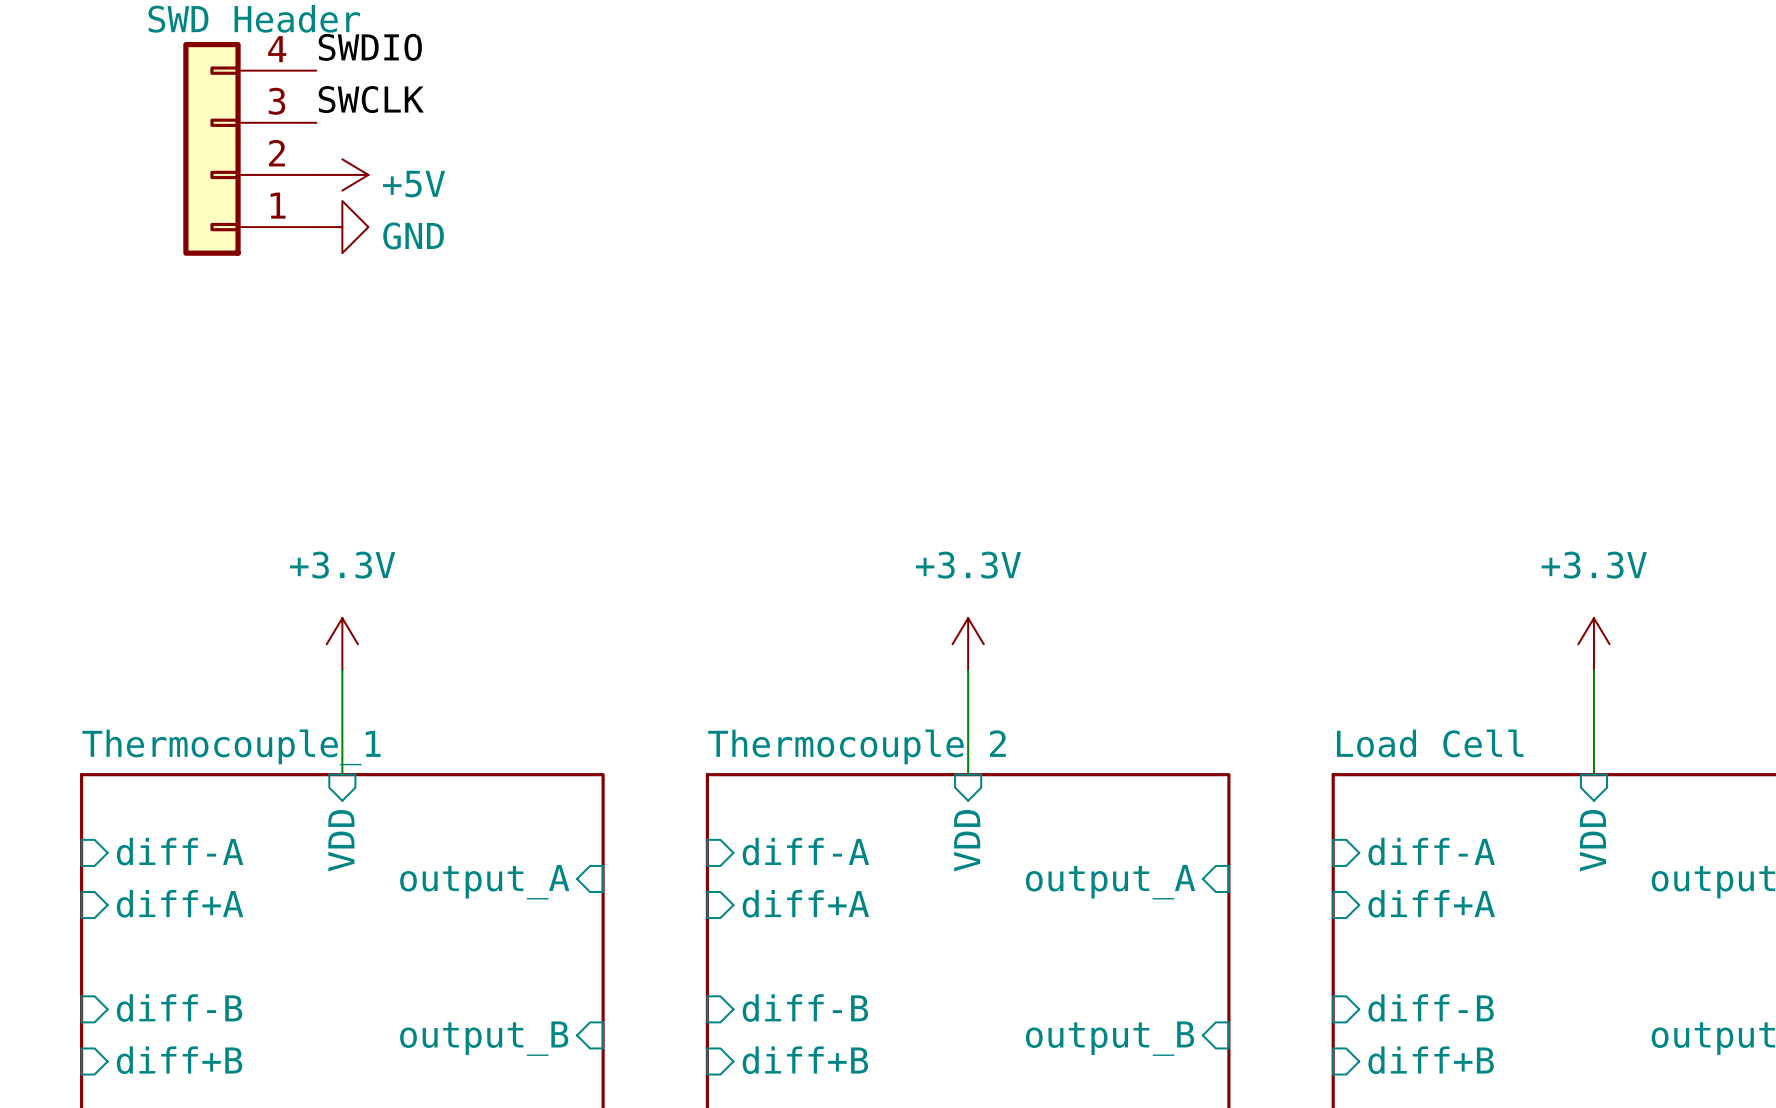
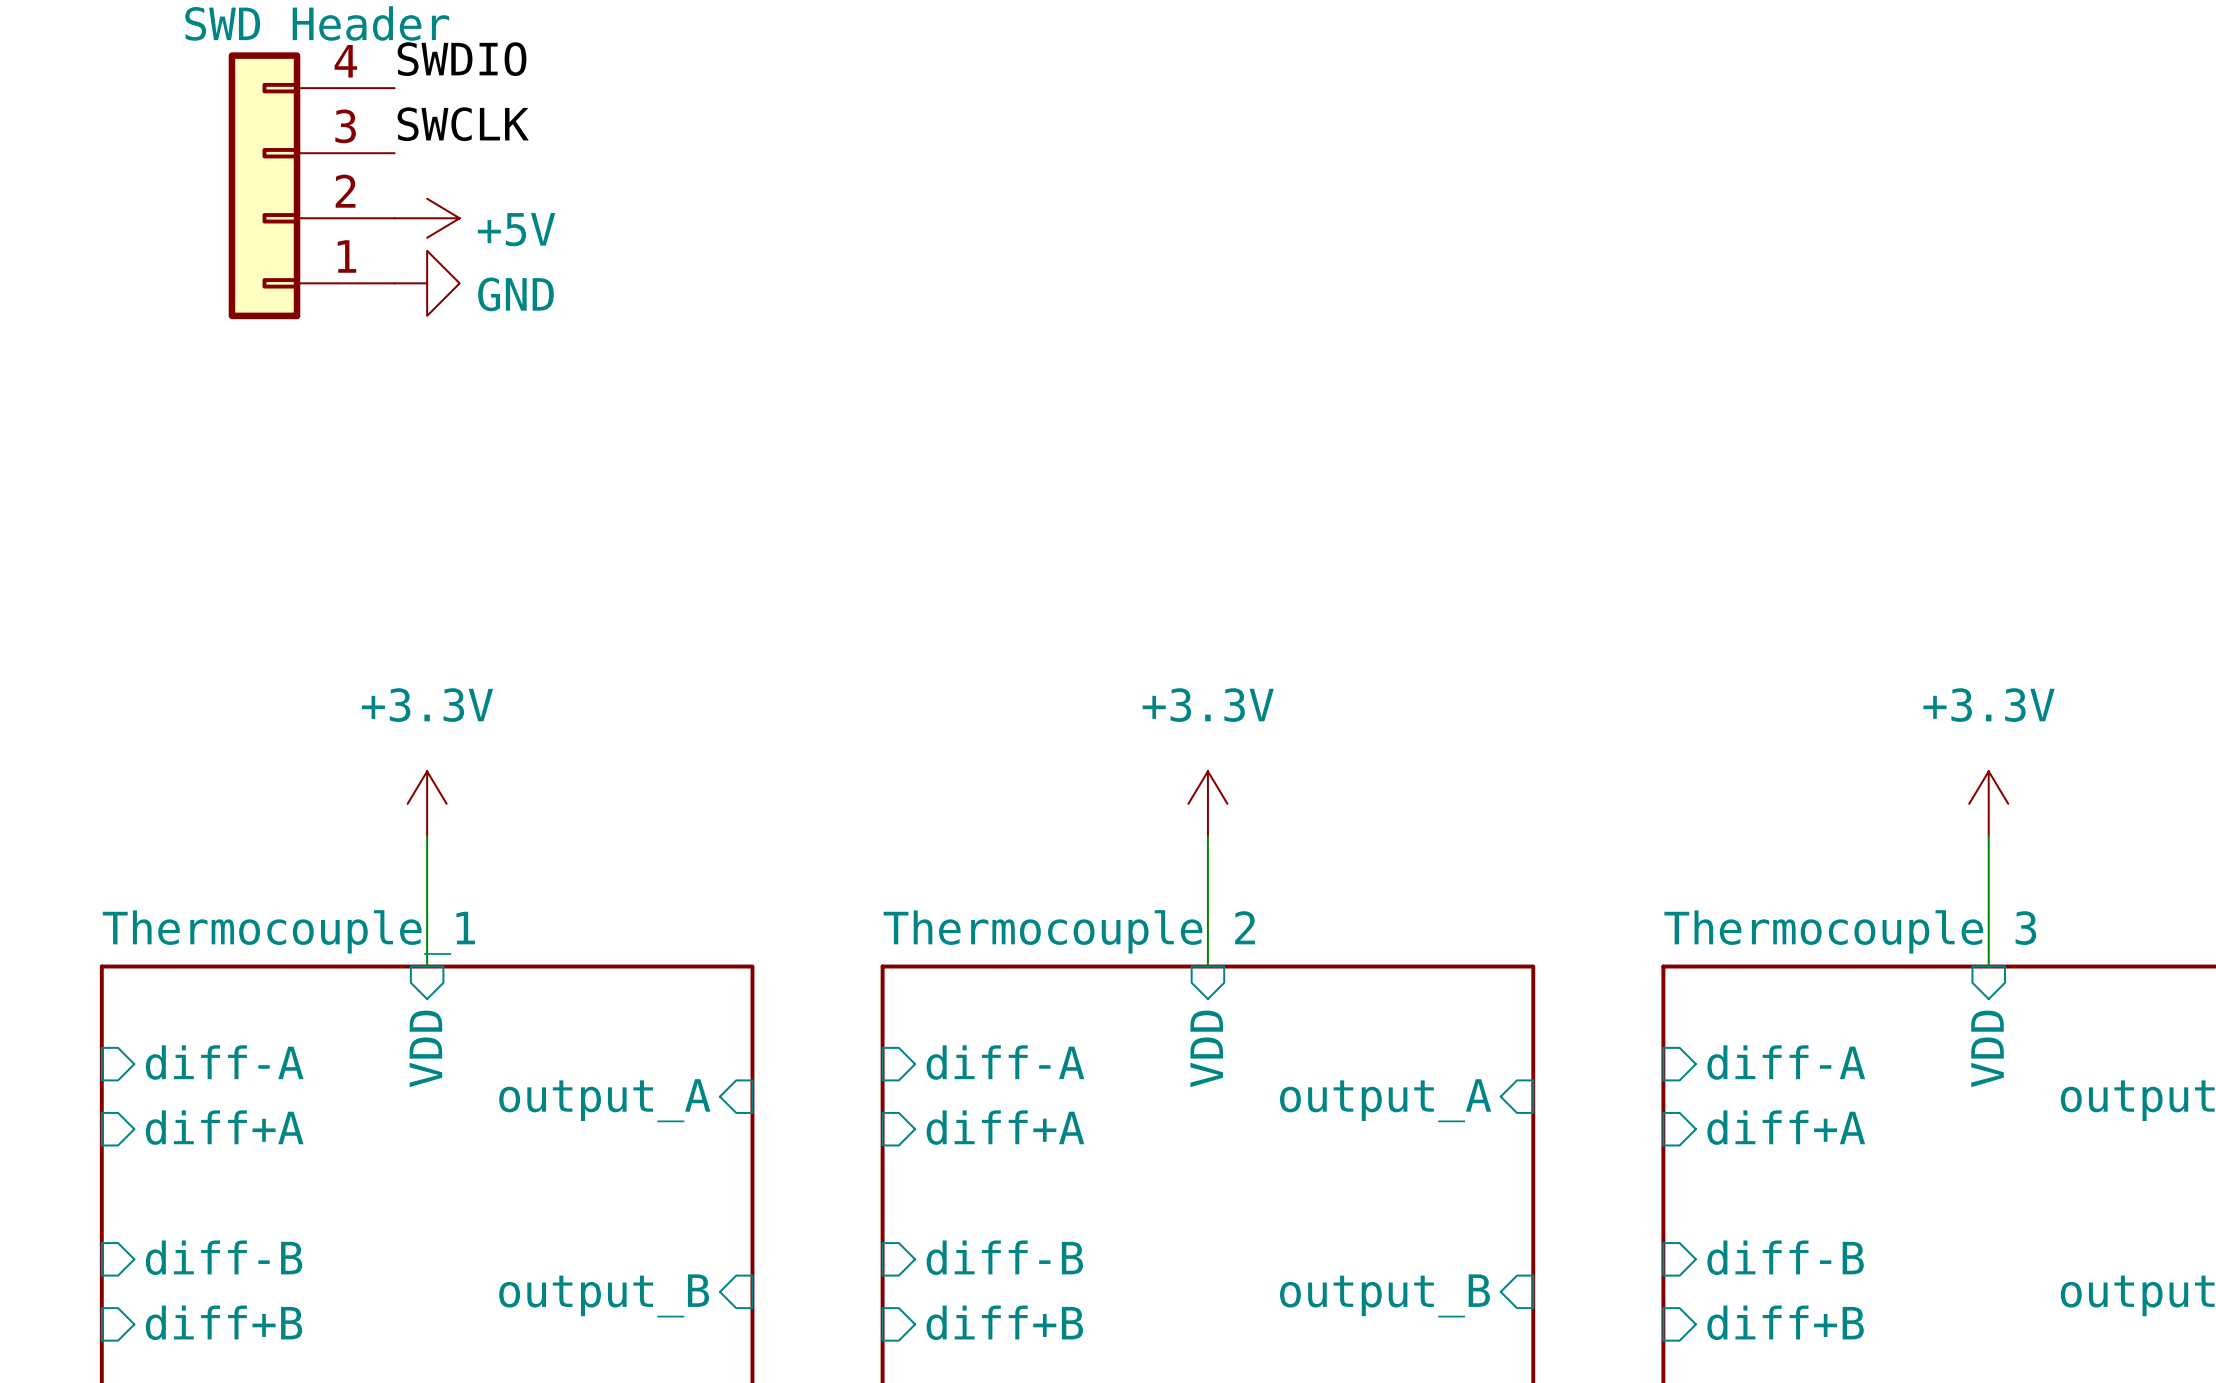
sheet Load Cell name: Load Cell (1430, 743) -> Thermocouple 3 (1850, 931)

